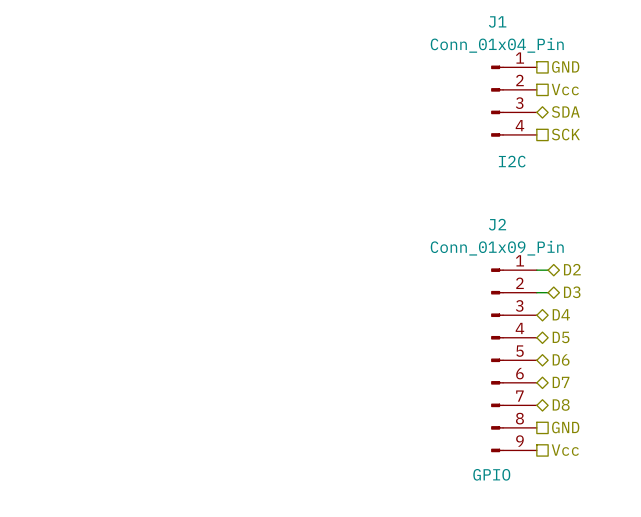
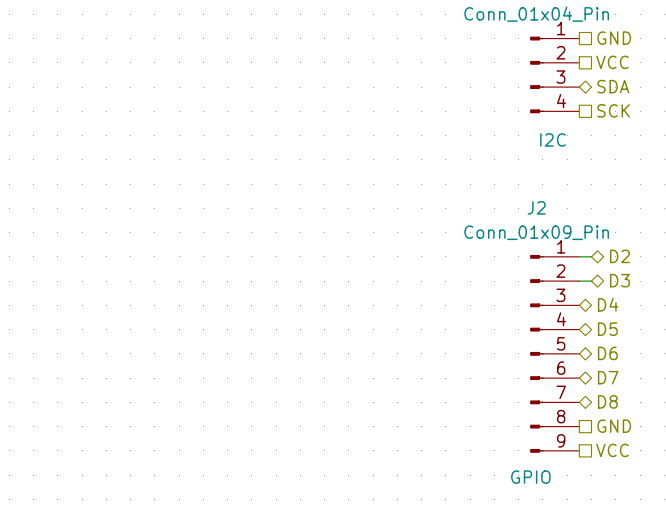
hierarchical label: Vcc (565, 89) -> VCC (612, 62)
hierarchical label: Vcc (565, 450) -> VCC (612, 450)

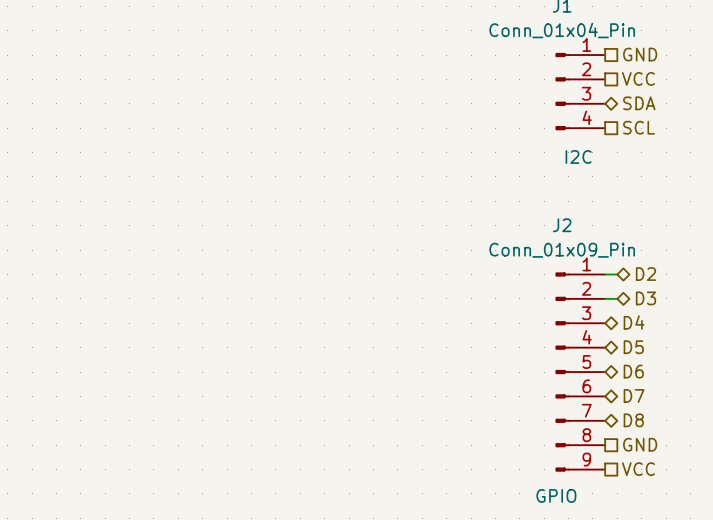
hierarchical label: SCK (613, 110) -> SCL (639, 127)

